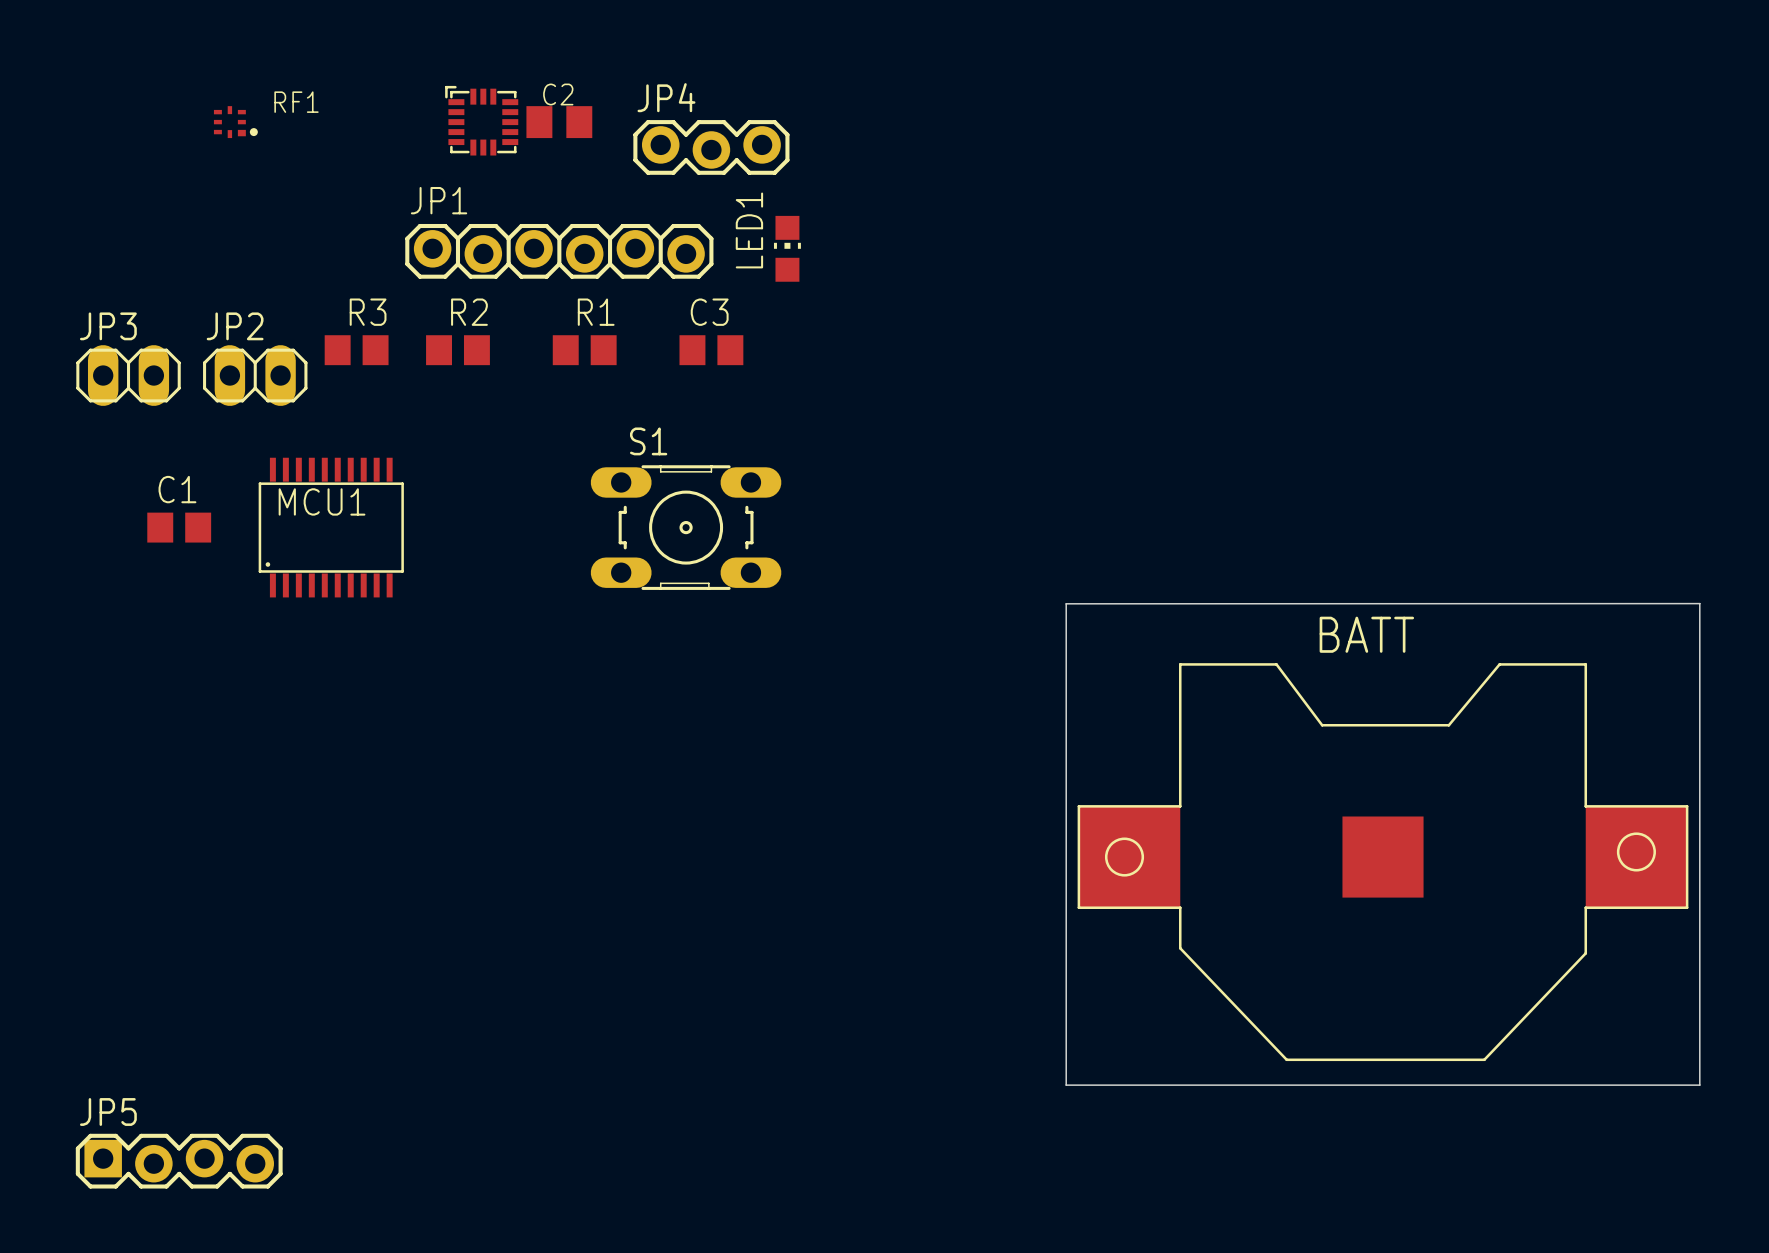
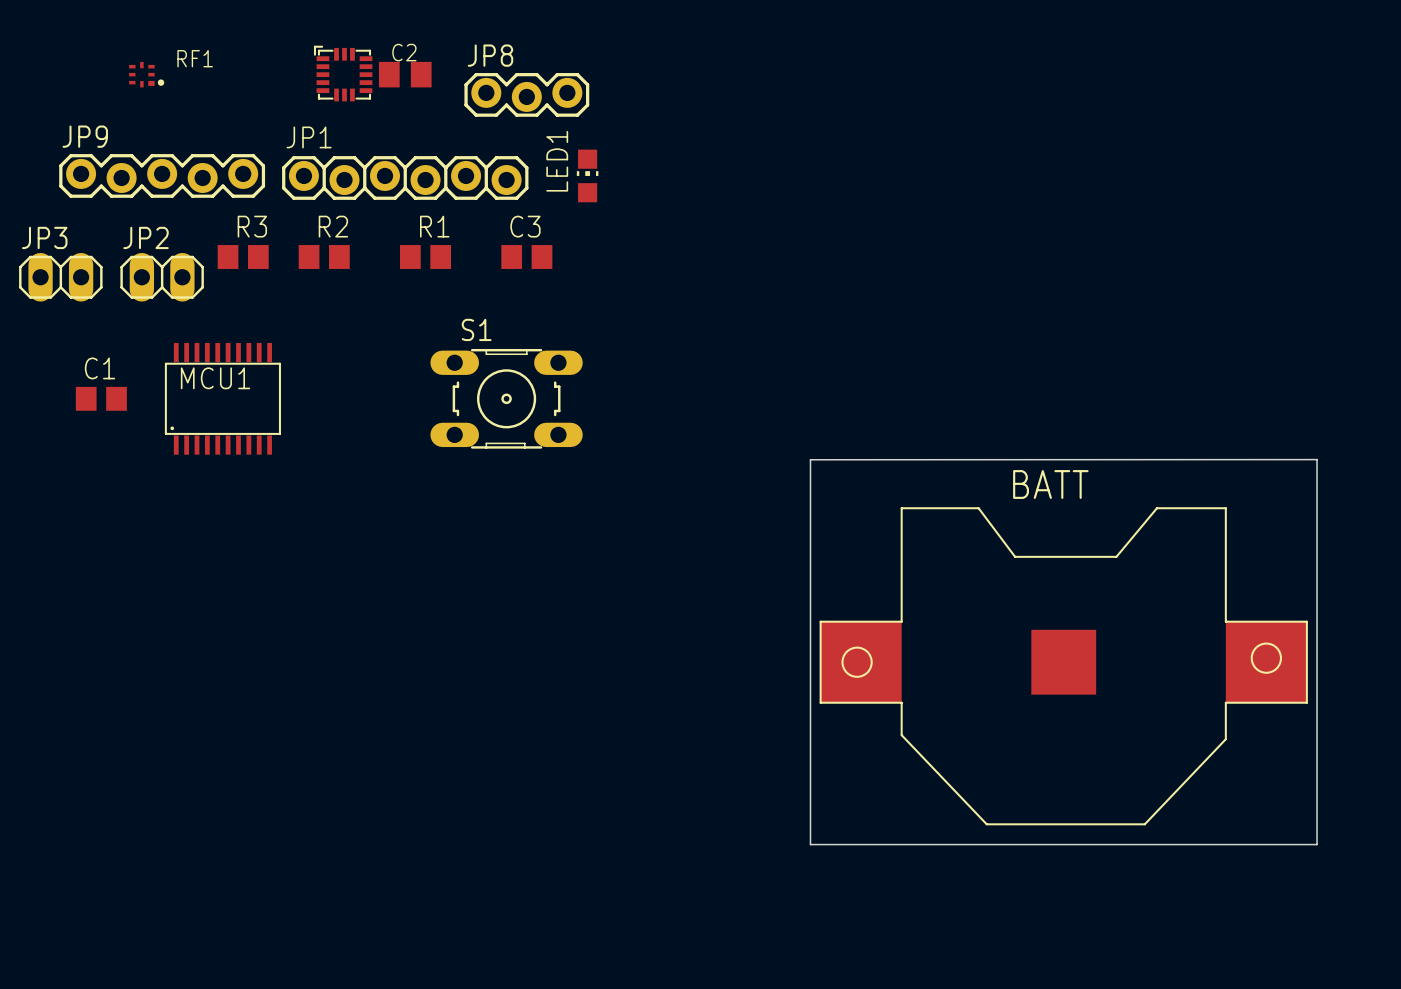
JP4 name: JP4 (666, 97) -> JP8 (490, 55)
JP9: none -> (162, 175)
JP5: (179, 1161) -> none

